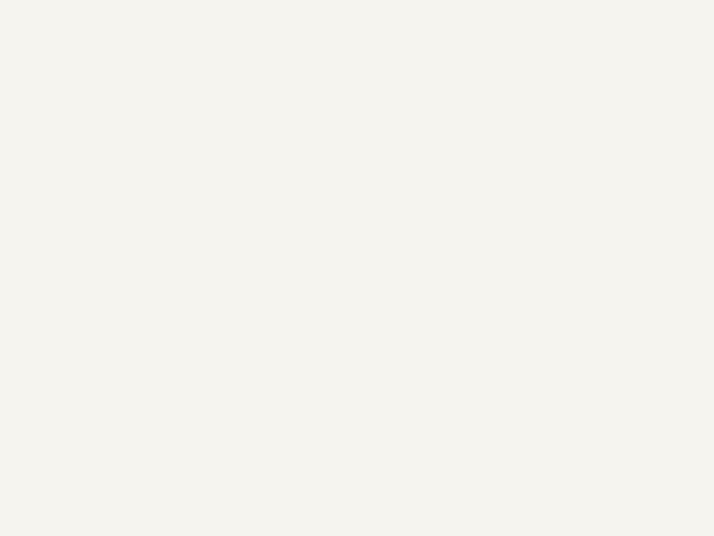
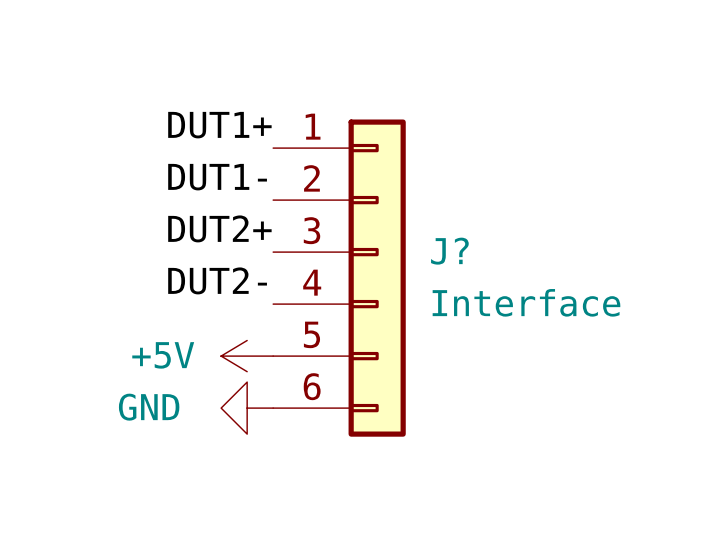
label: none -> DUT1+ (219, 125)
label: none -> DUT1- (217, 177)
label: none -> DUT2+ (219, 228)
J?: none -> Interface (339, 278)
label: none -> DUT2- (217, 280)
power symbol: none -> +5V (247, 356)
power symbol: none -> GND (247, 408)

